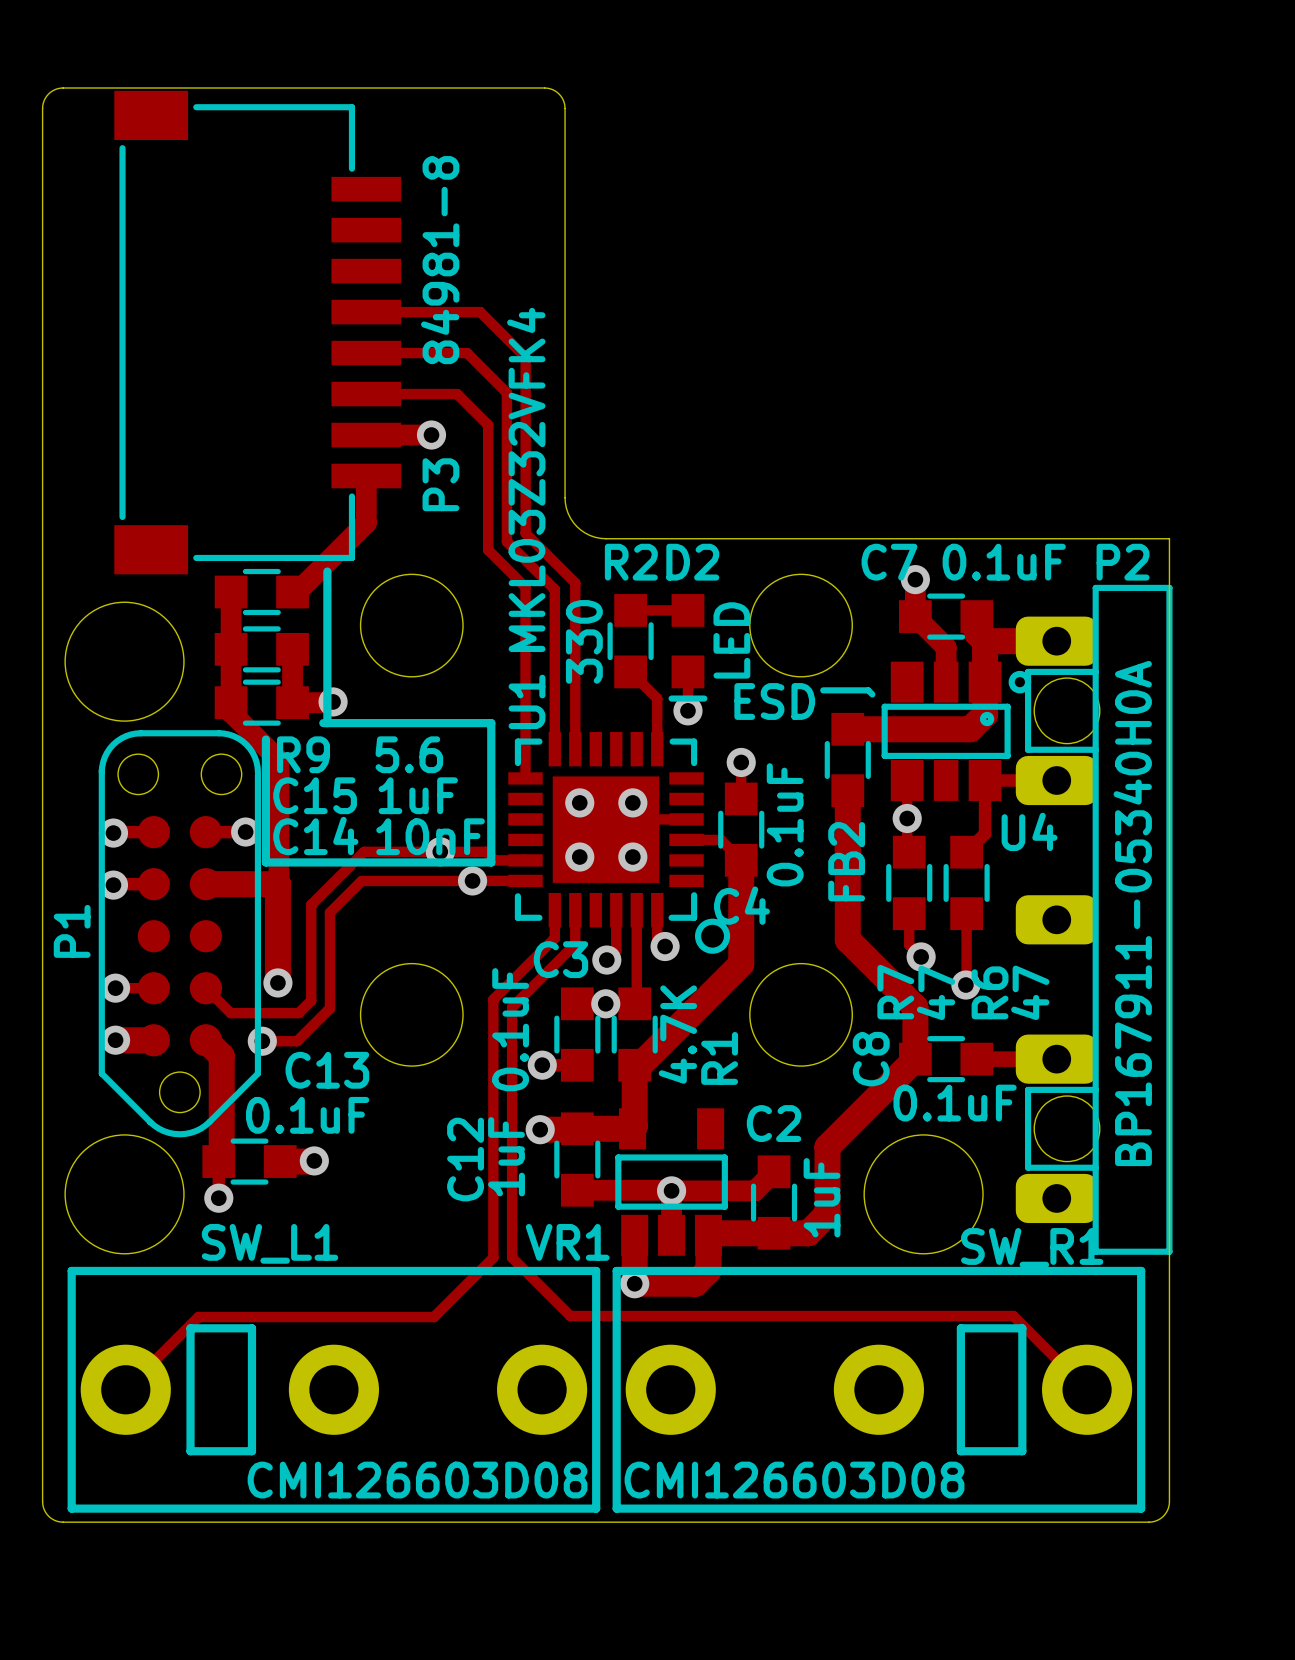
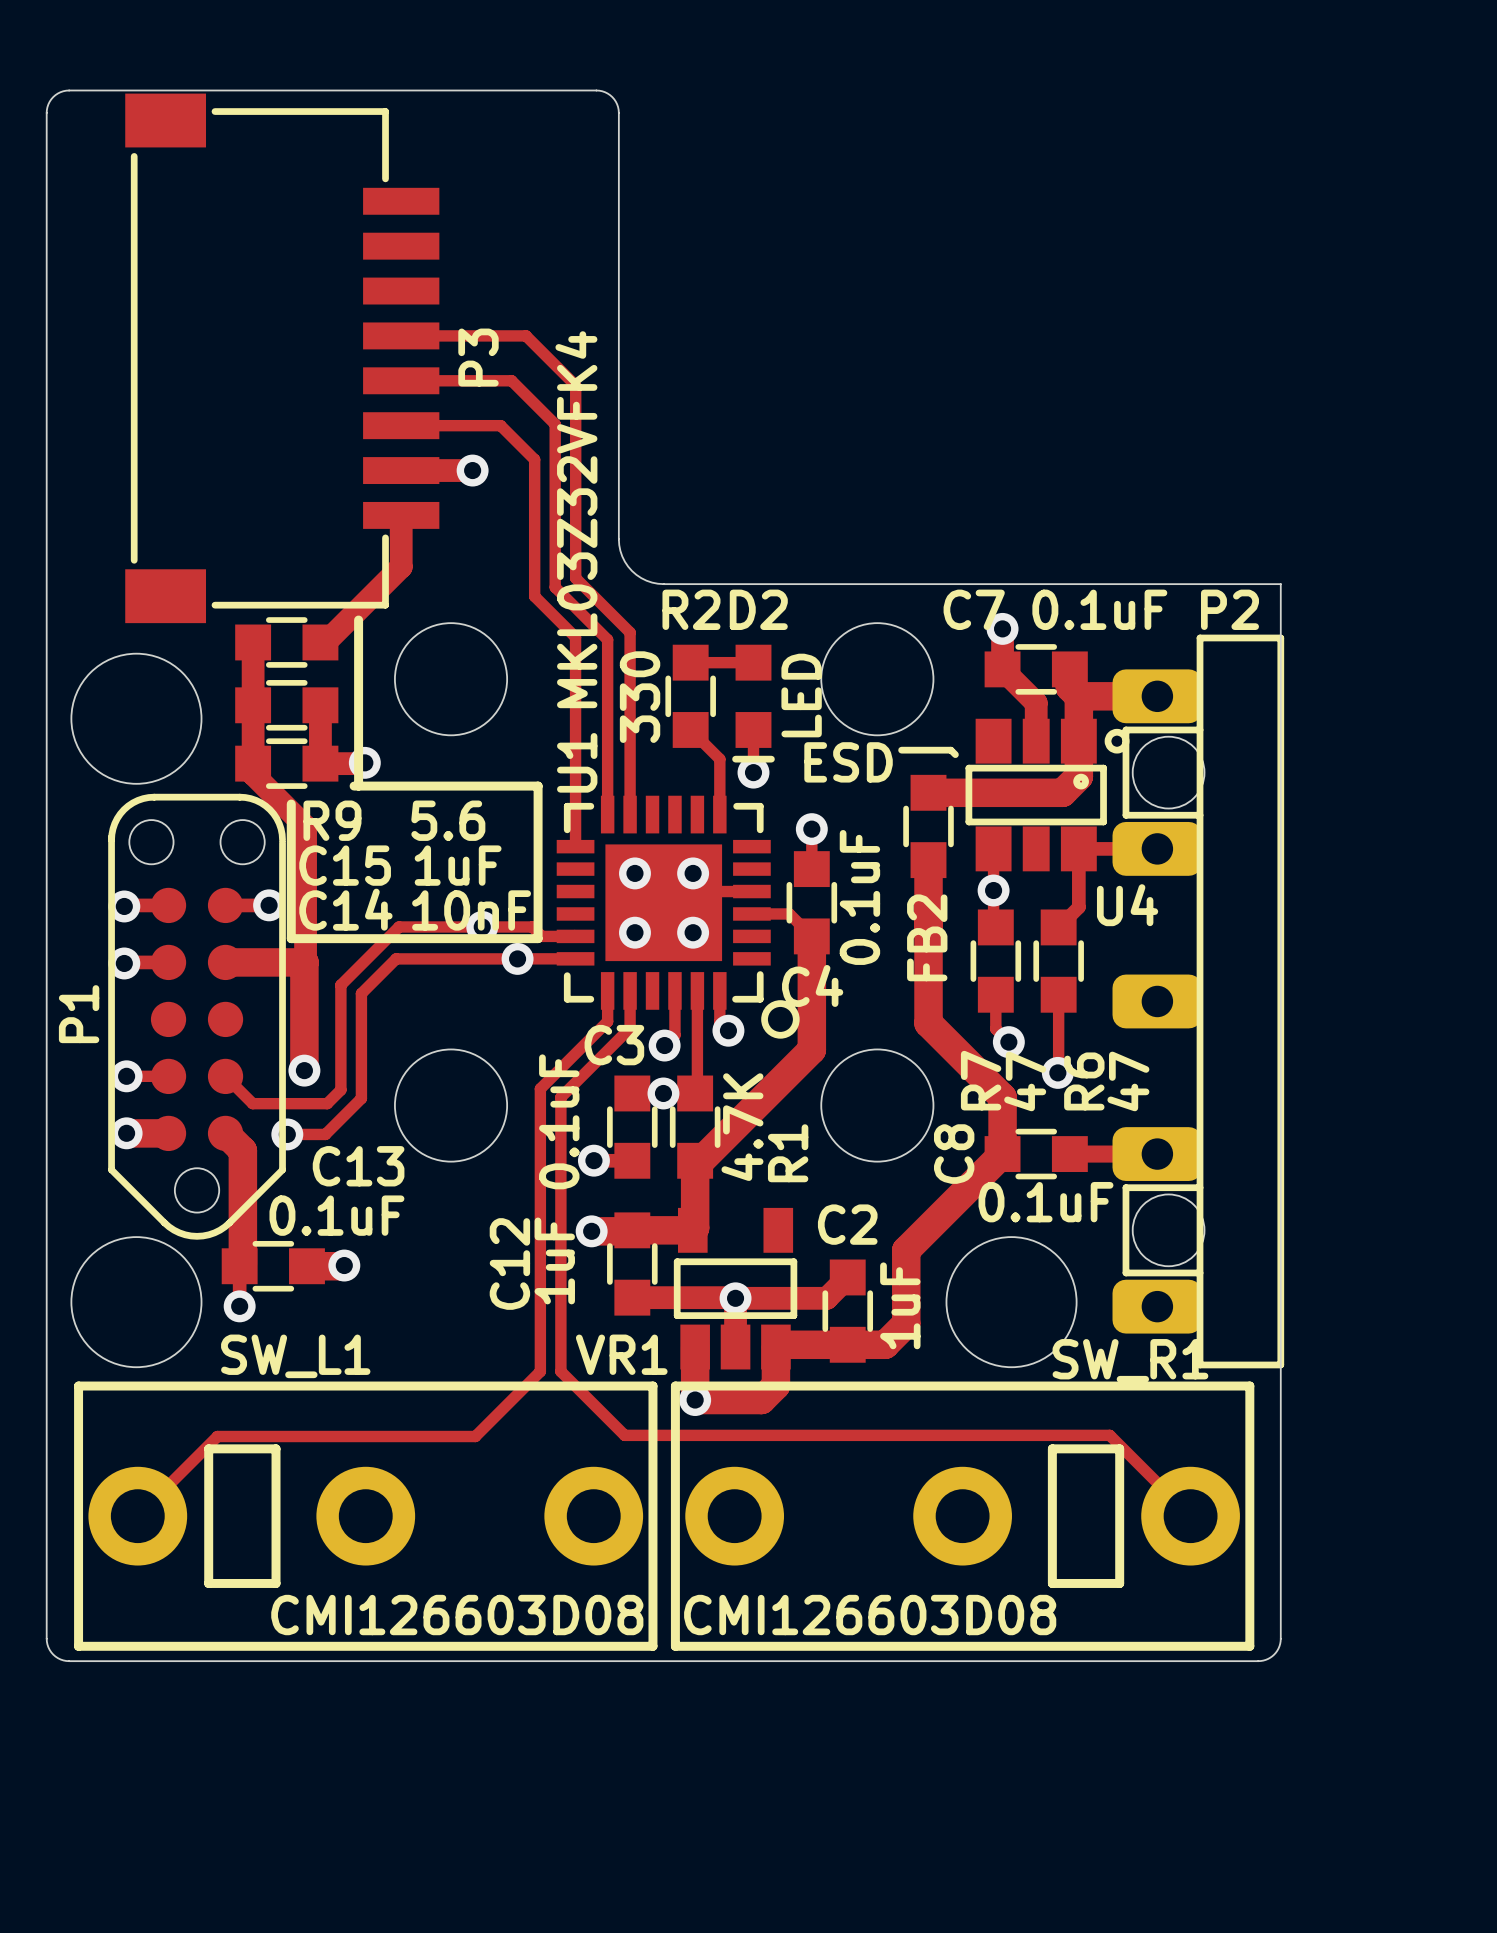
text: 84981-8 (440, 260) -> none
P3 name position: P3 (440, 484) -> P3 (478, 357)
text: BP167911-05340H0A (1132, 913) -> none

